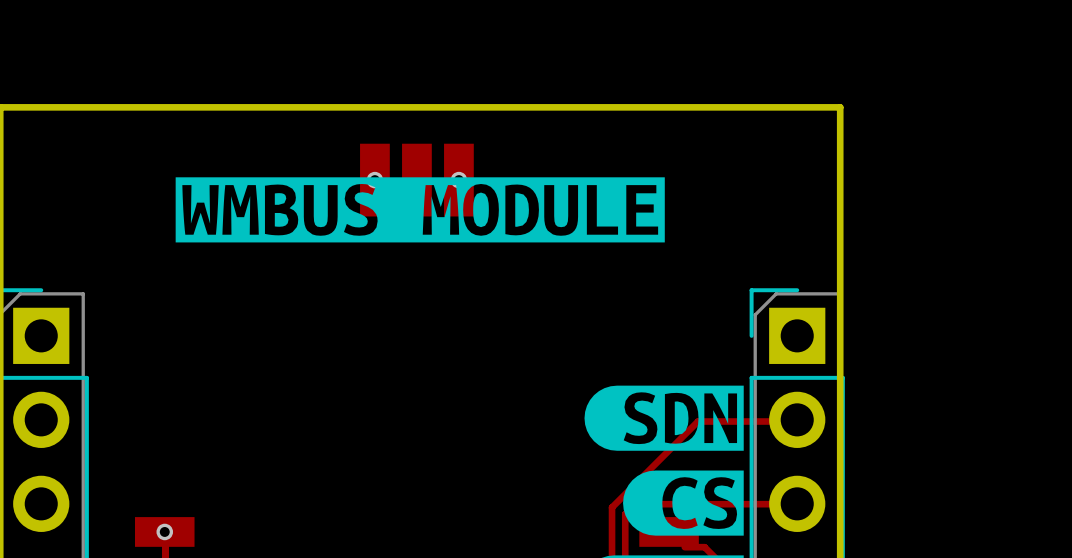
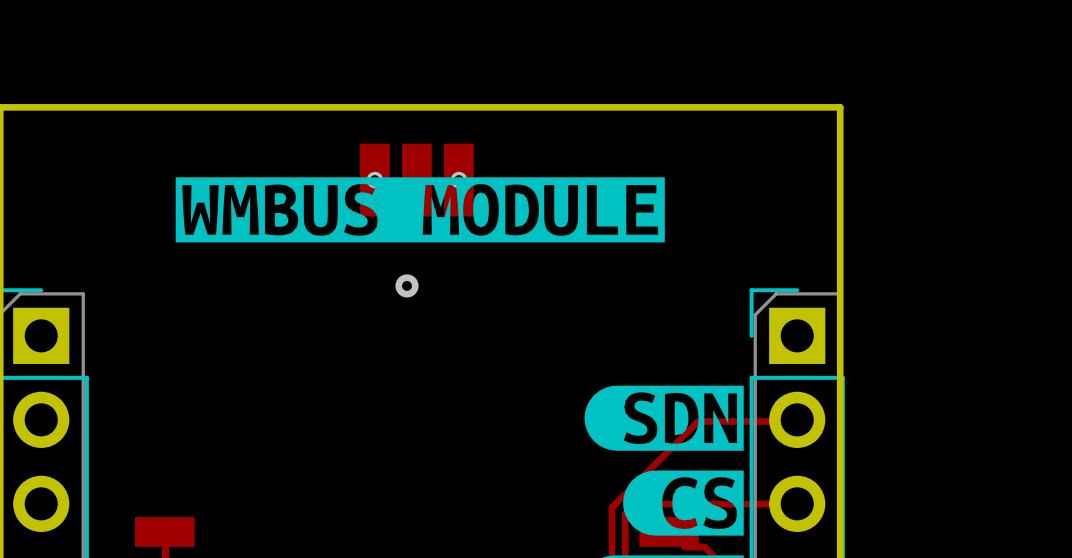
via: none -> (407, 285)
via: (164, 531) -> none

